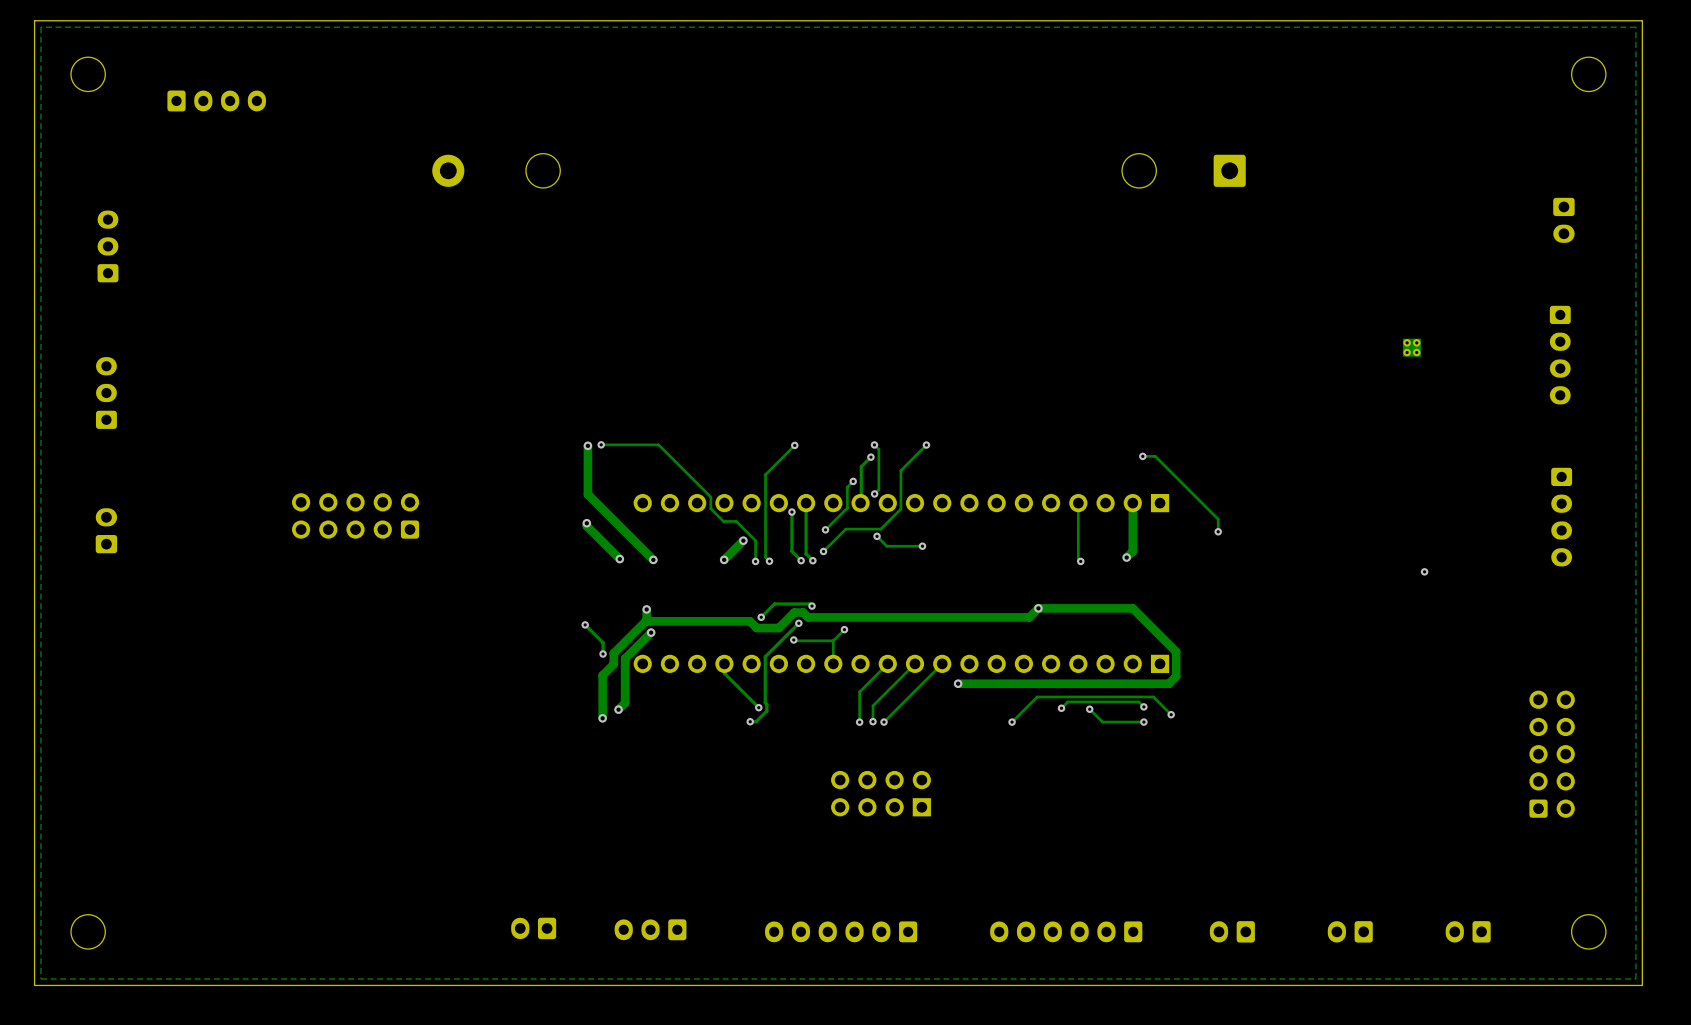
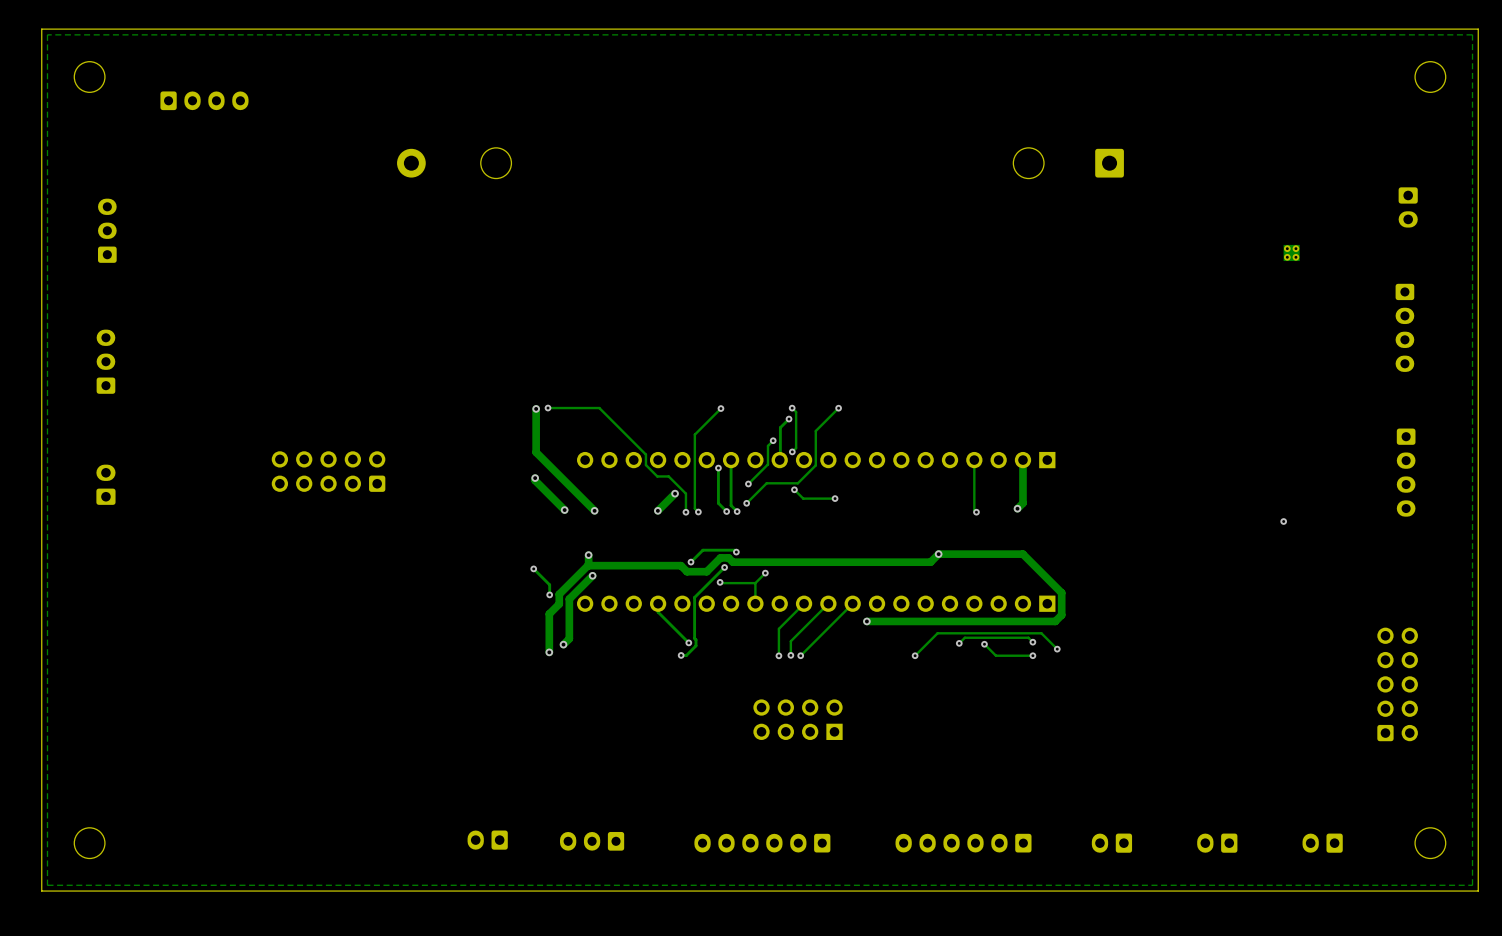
part position: (1411, 347) -> (1291, 252)
track: (1142, 456) (1155, 456) (1218, 519) (1218, 531) -> none
via: (1142, 456) -> none
via: (1218, 531) -> none

